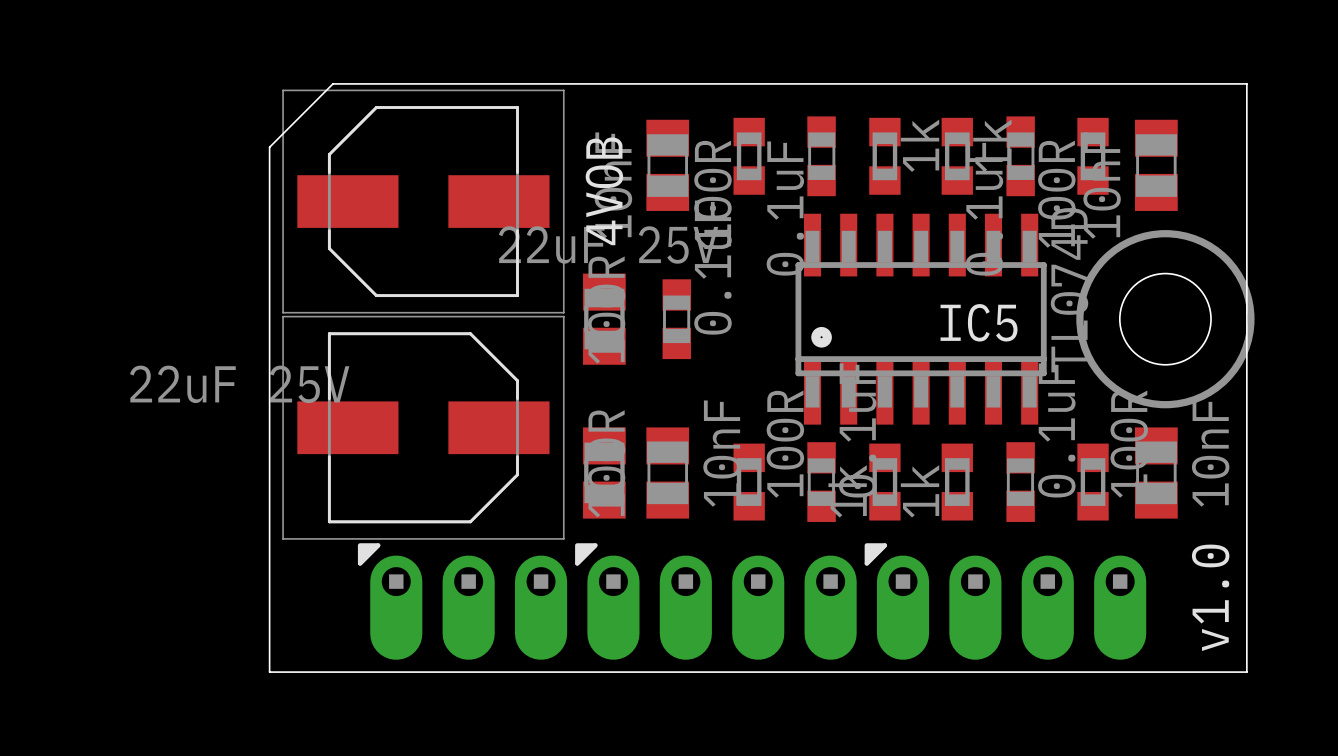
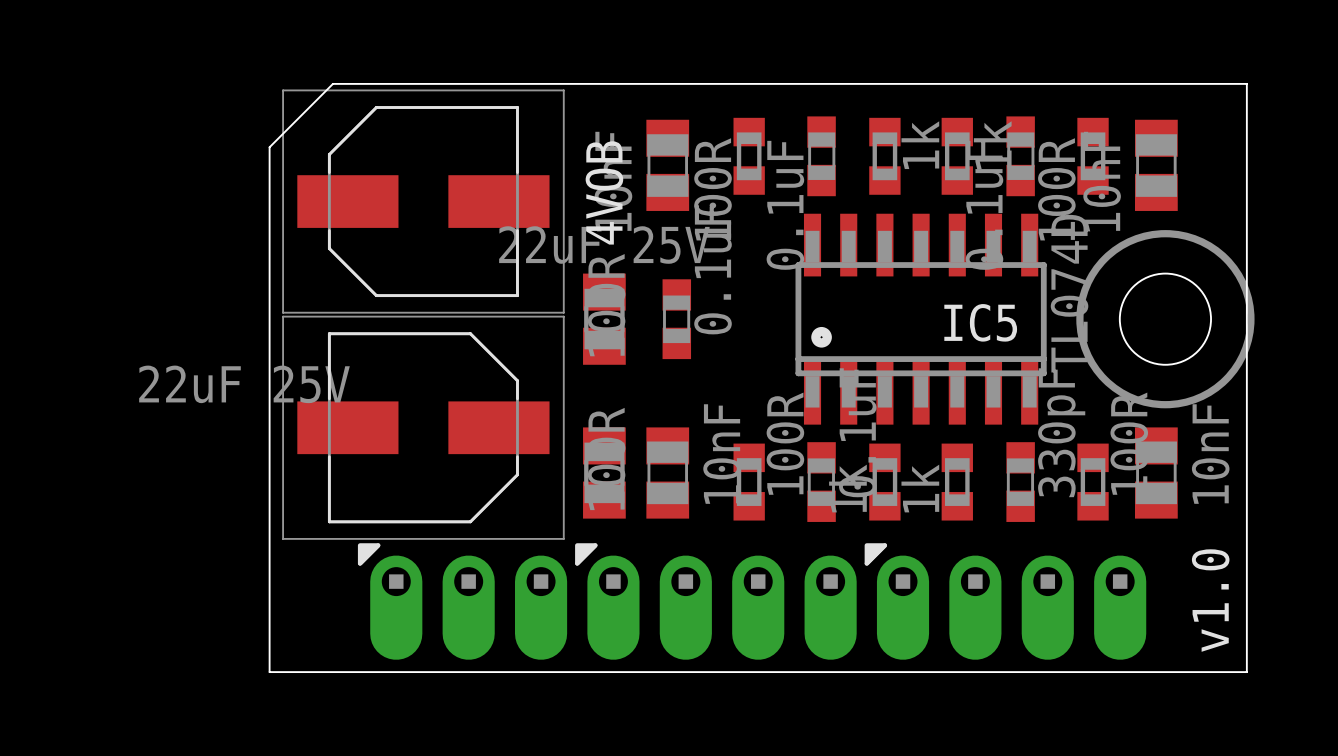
part value: 0.1uF (1056, 430) -> 330pF (1061, 432)

